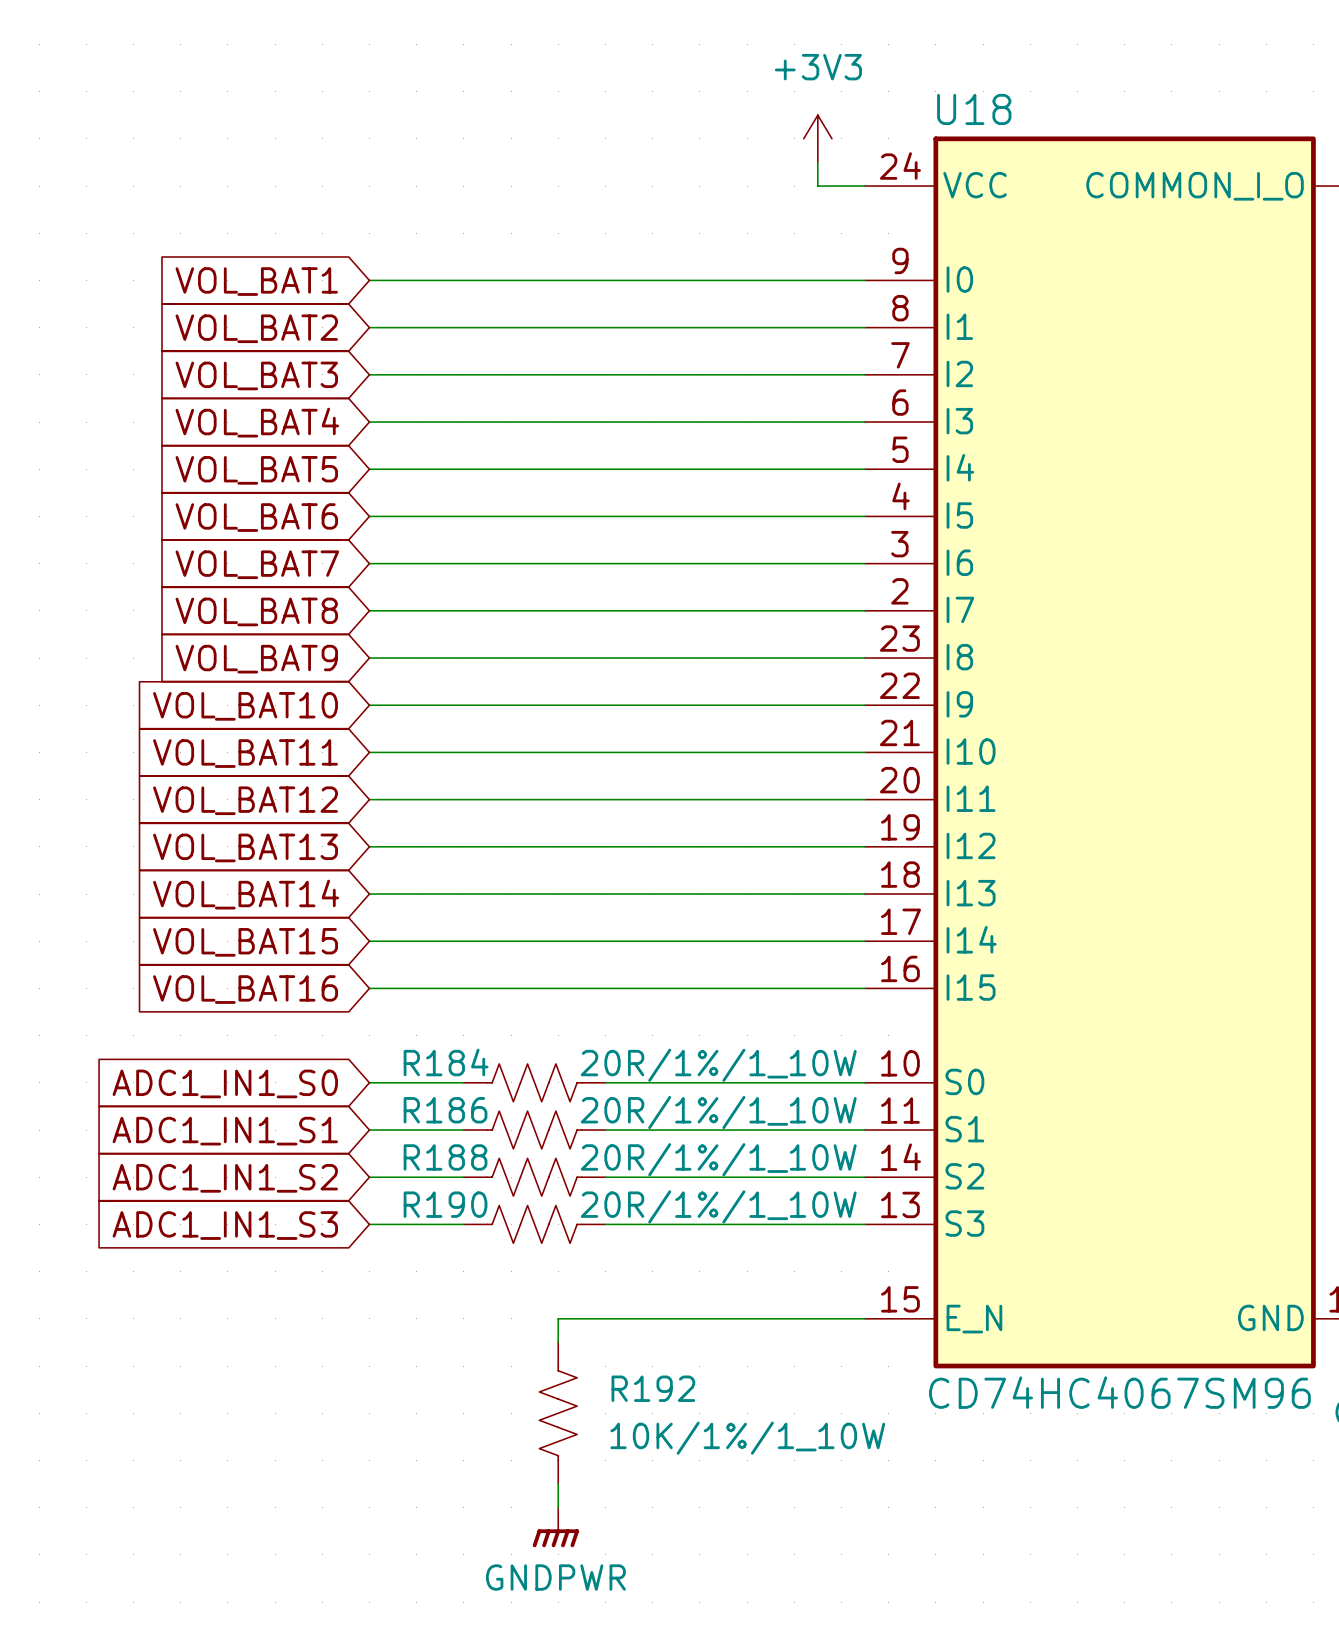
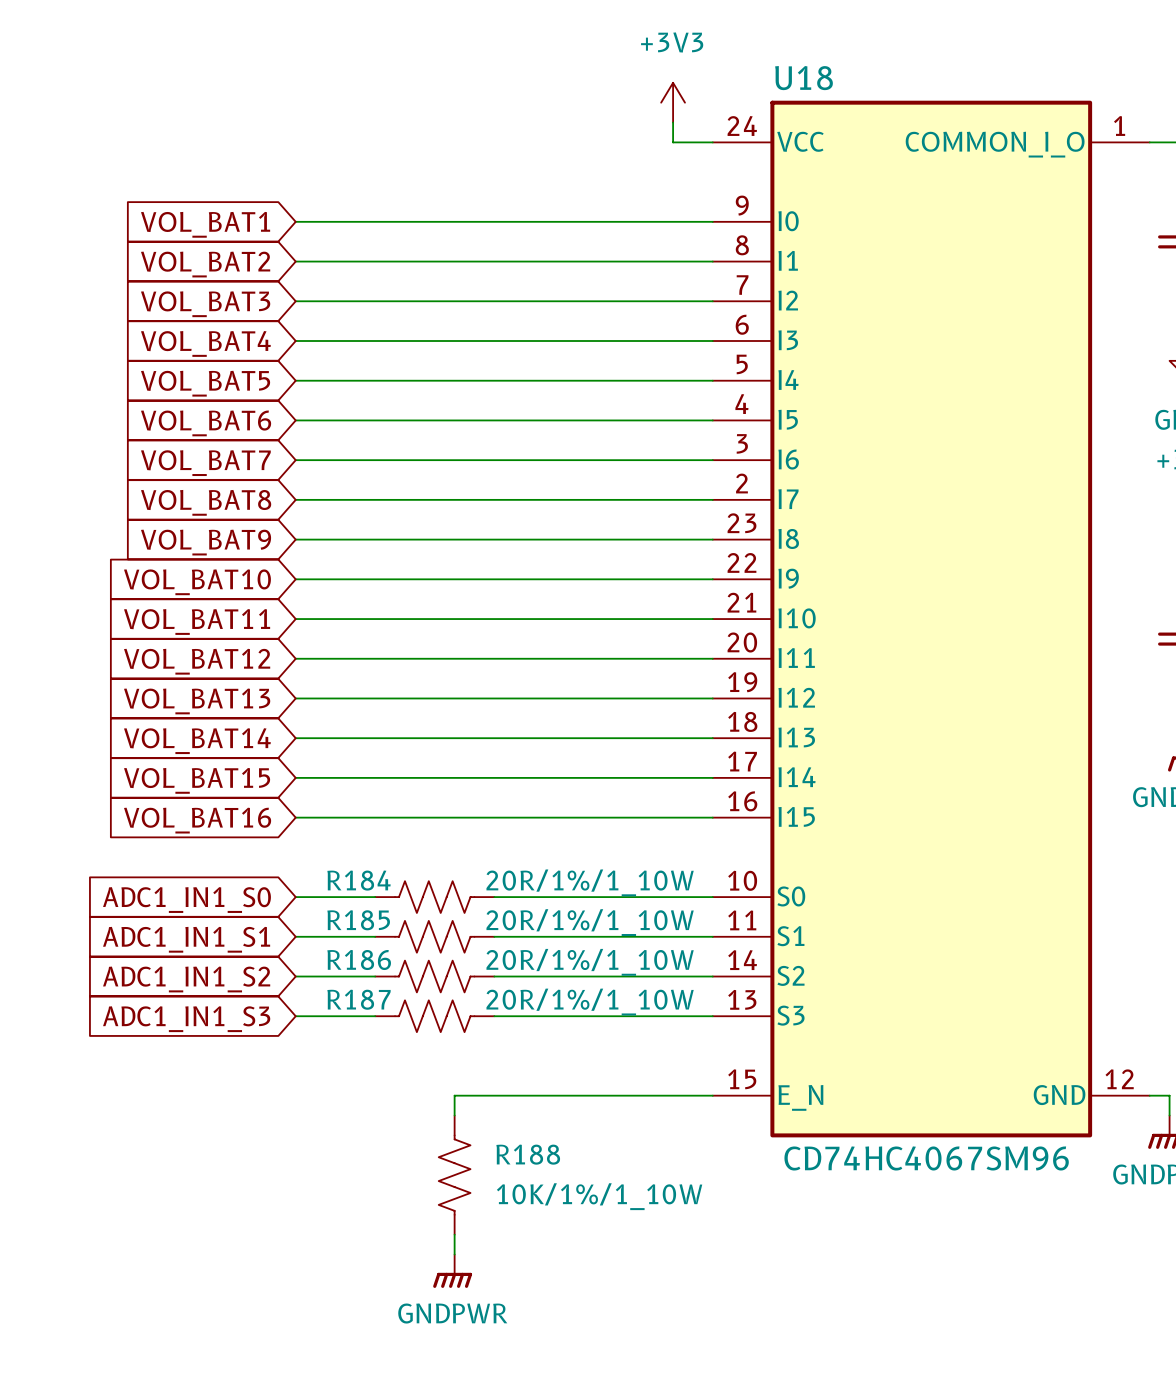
R186 name: R186 (445, 1110) -> R185 (358, 920)
R188 name: R188 (445, 1157) -> R186 (359, 959)
R190 name: R190 (445, 1204) -> R187 (358, 999)
R192 name: R192 (653, 1388) -> R188 (528, 1154)

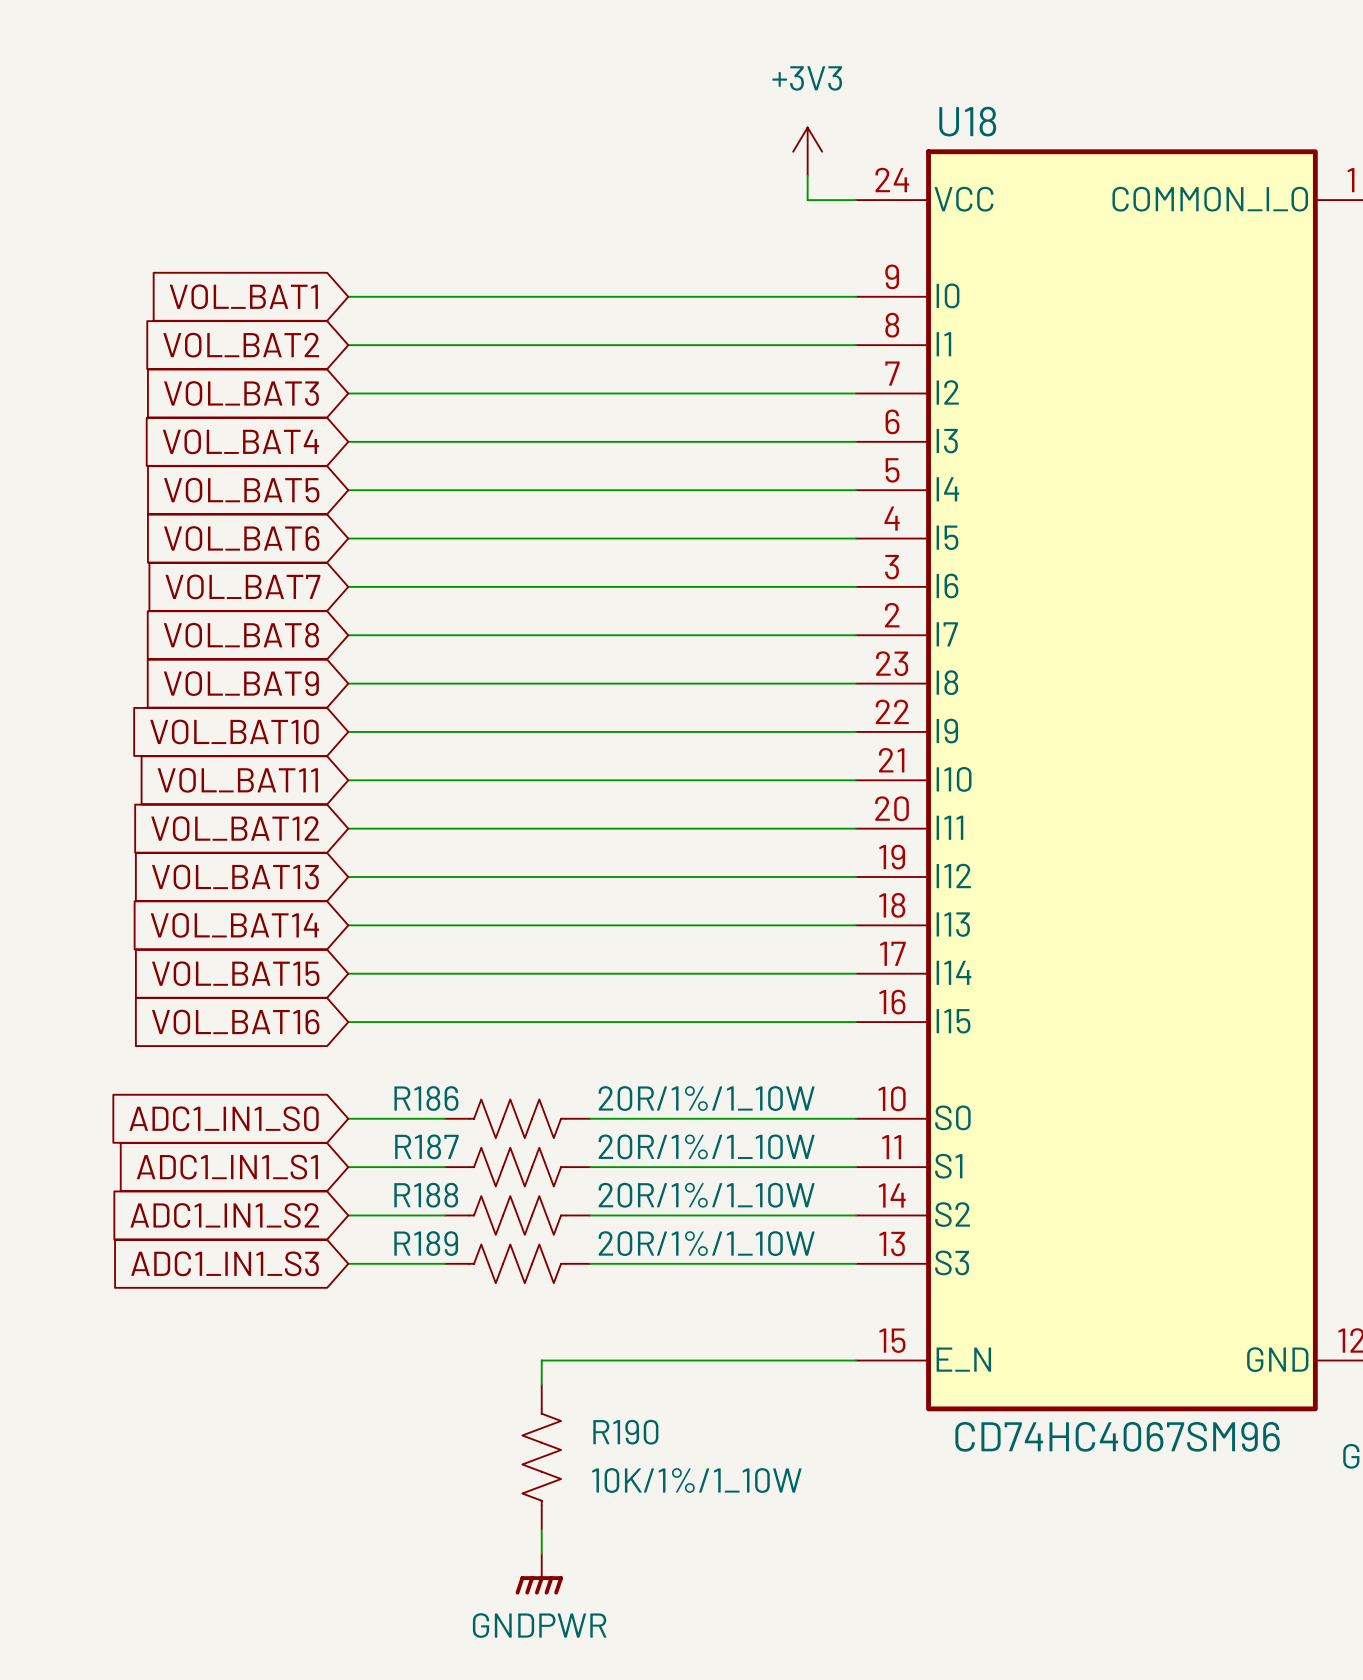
R184 name: R184 (358, 880) -> R186 (426, 1098)
R185 name: R185 (358, 920) -> R187 (426, 1146)
R186 name: R186 (359, 959) -> R188 (426, 1195)
R187 name: R187 (358, 999) -> R189 (426, 1243)
R188 name: R188 (528, 1154) -> R190 (625, 1432)

